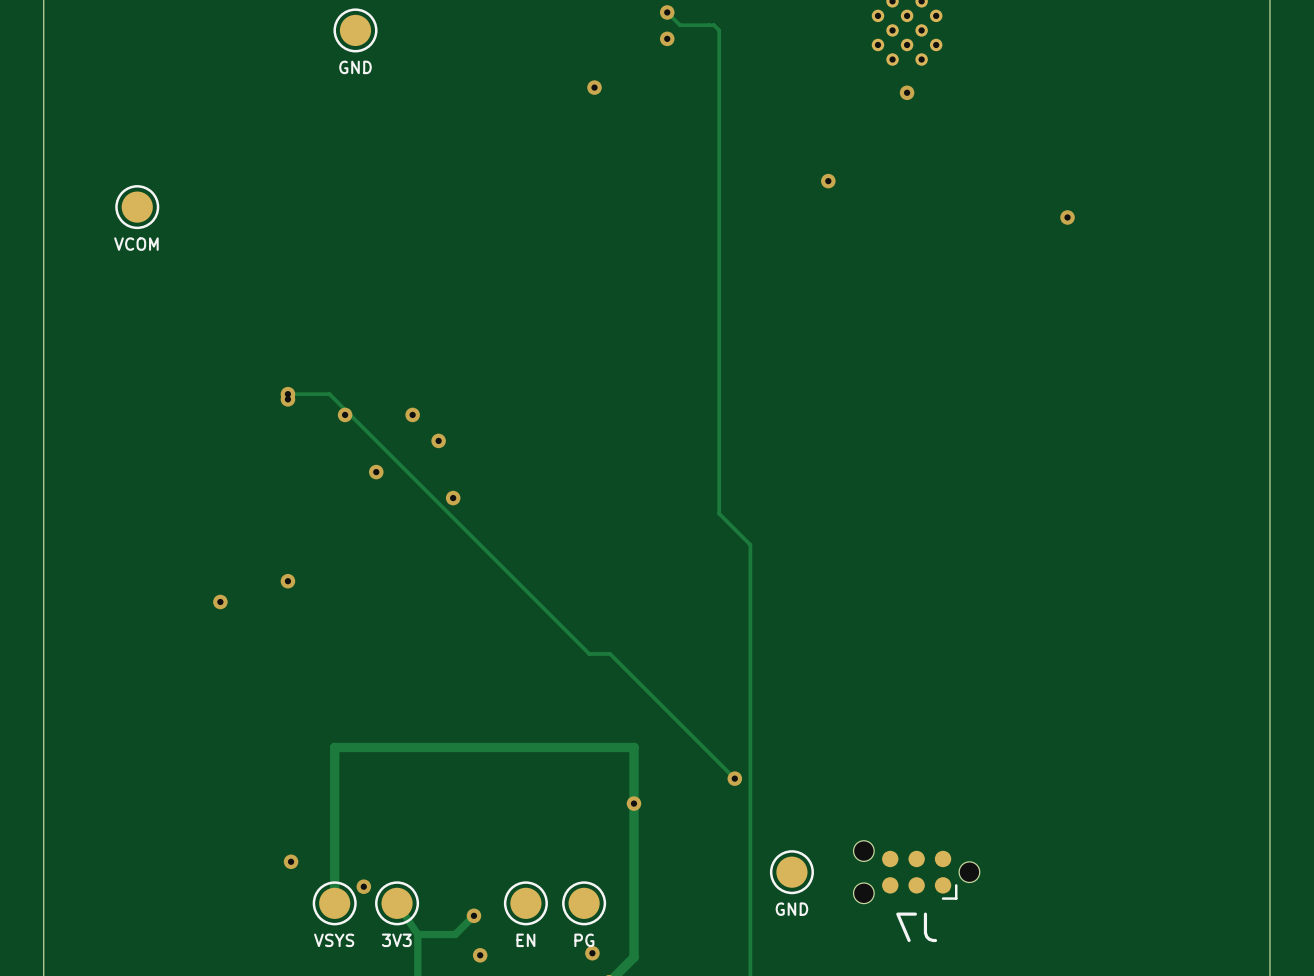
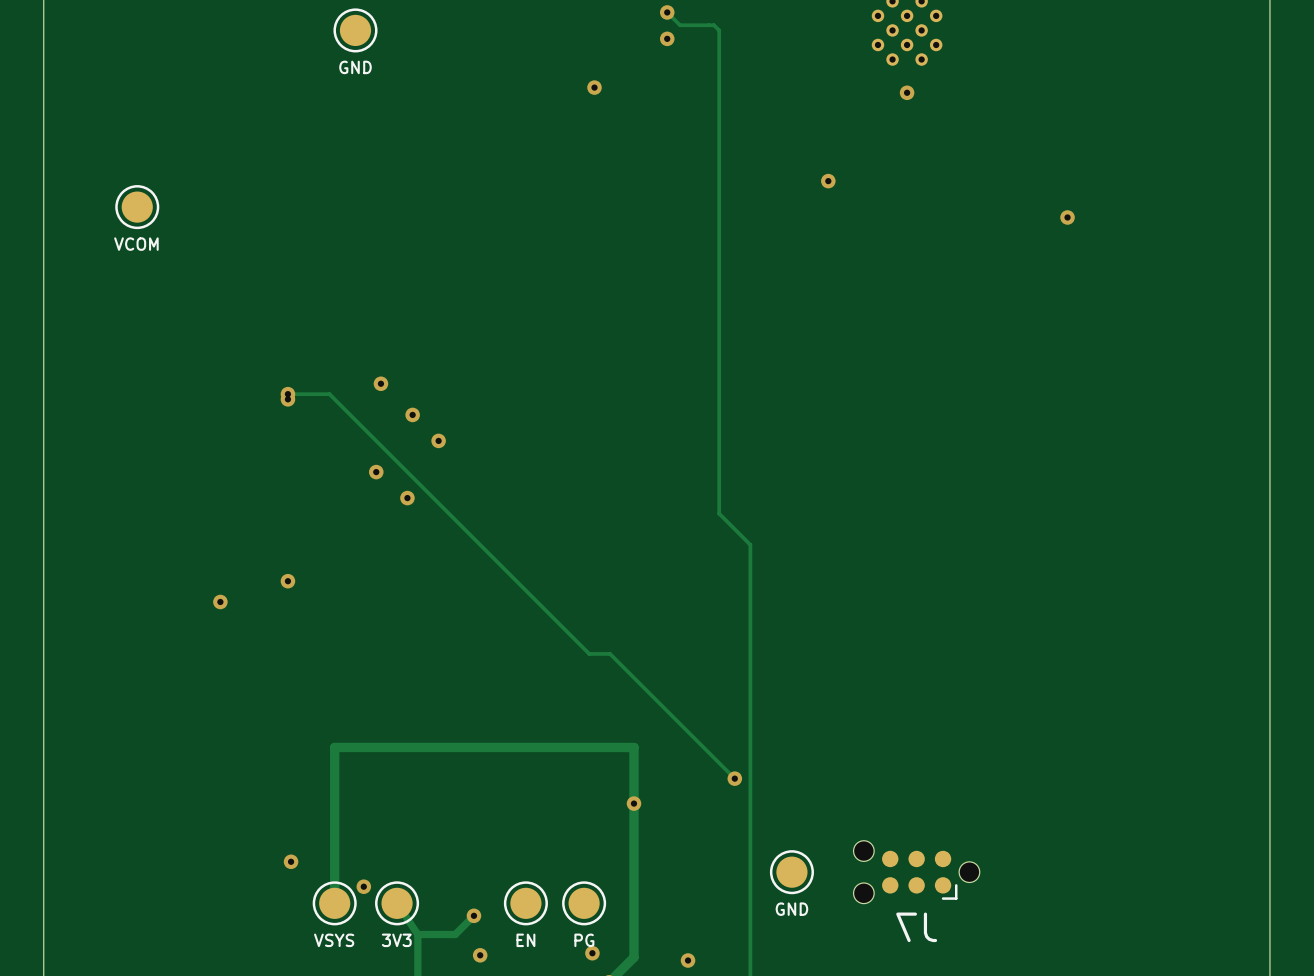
via position: (345, 414) -> (380, 383)
via position: (453, 498) -> (407, 498)
via: none -> (688, 960)

